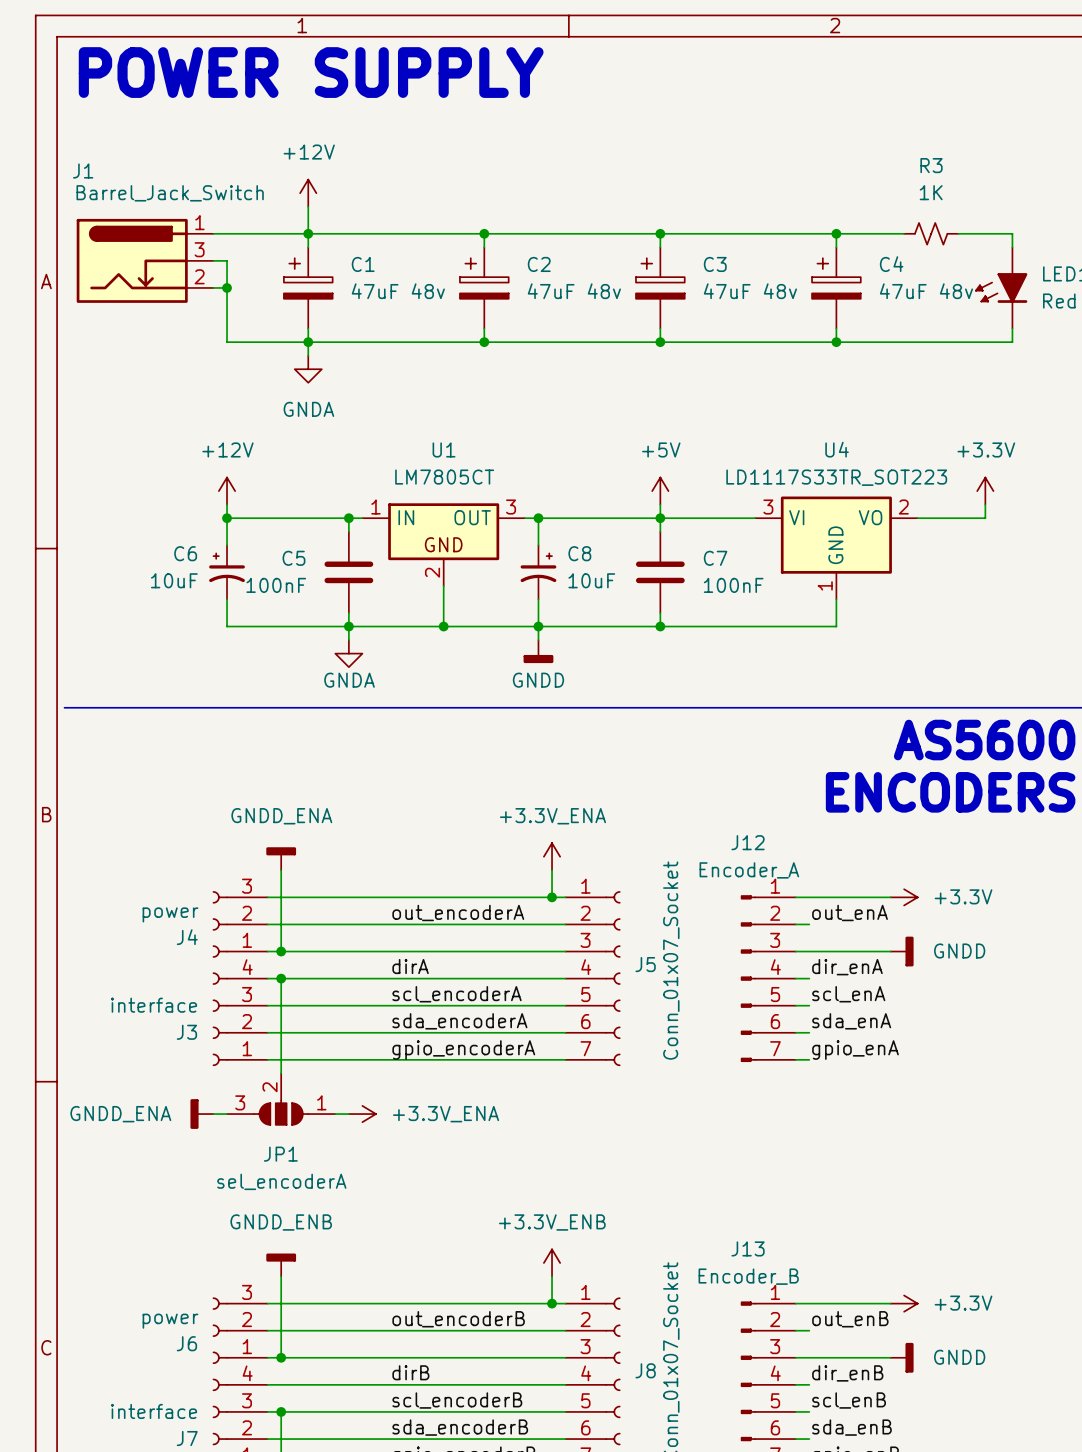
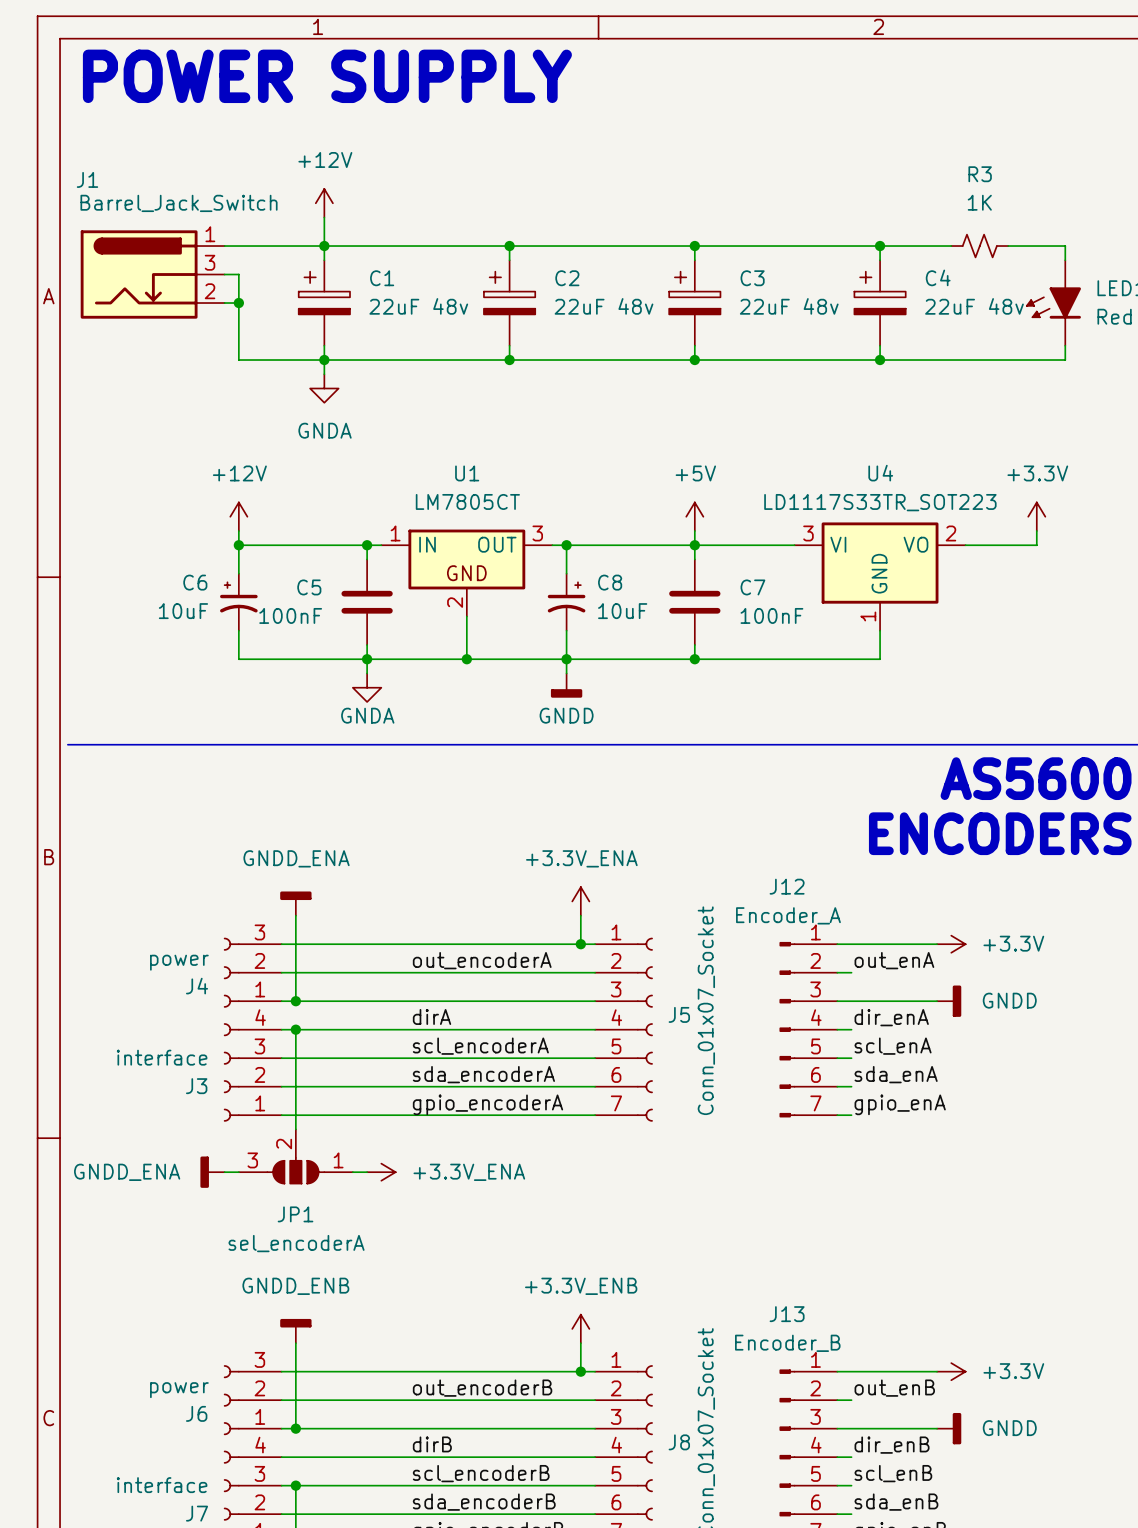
C1 value: 47uF 48v (398, 291) -> 22uF 48v (418, 306)
C2 value: 47uF 48v (574, 291) -> 22uF 48v (604, 306)
C3 value: 47uF 48v (750, 291) -> 22uF 48v (789, 306)
C4 value: 47uF 48v (926, 291) -> 22uF 48v (974, 306)

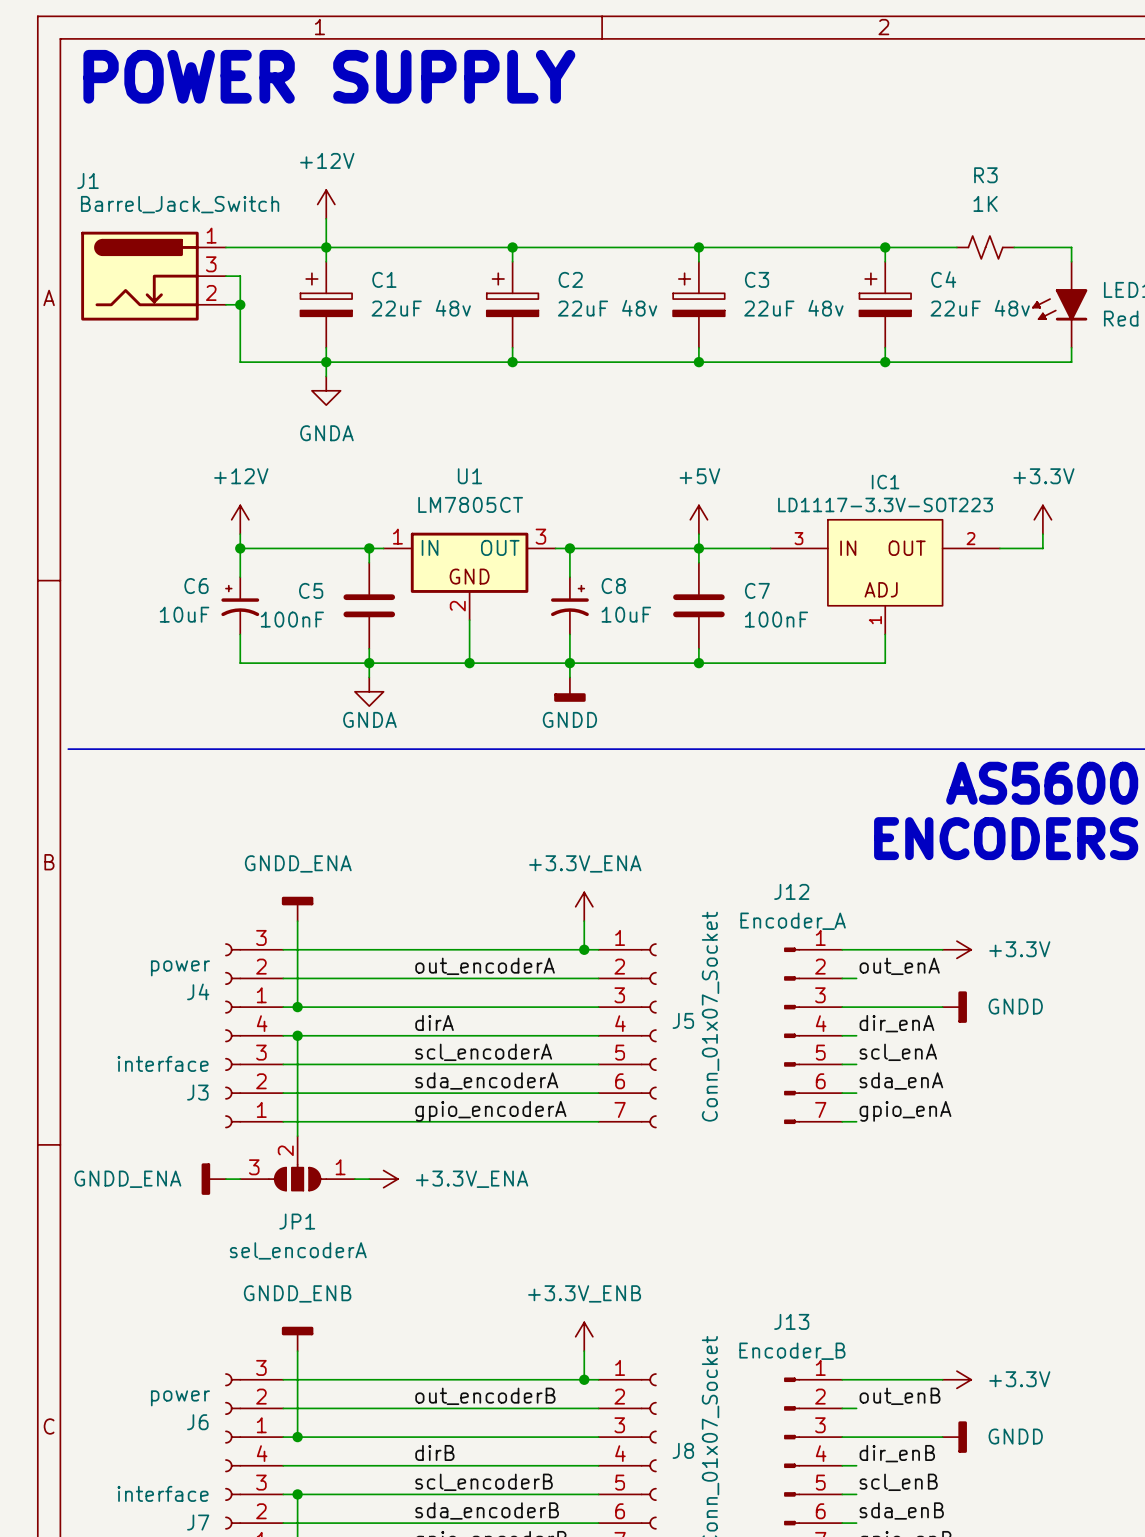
IC1: none -> LD1117-3.3V-SOT223 (885, 577)
U4: LD1117S33TR_SOT223 (880, 576) -> none

